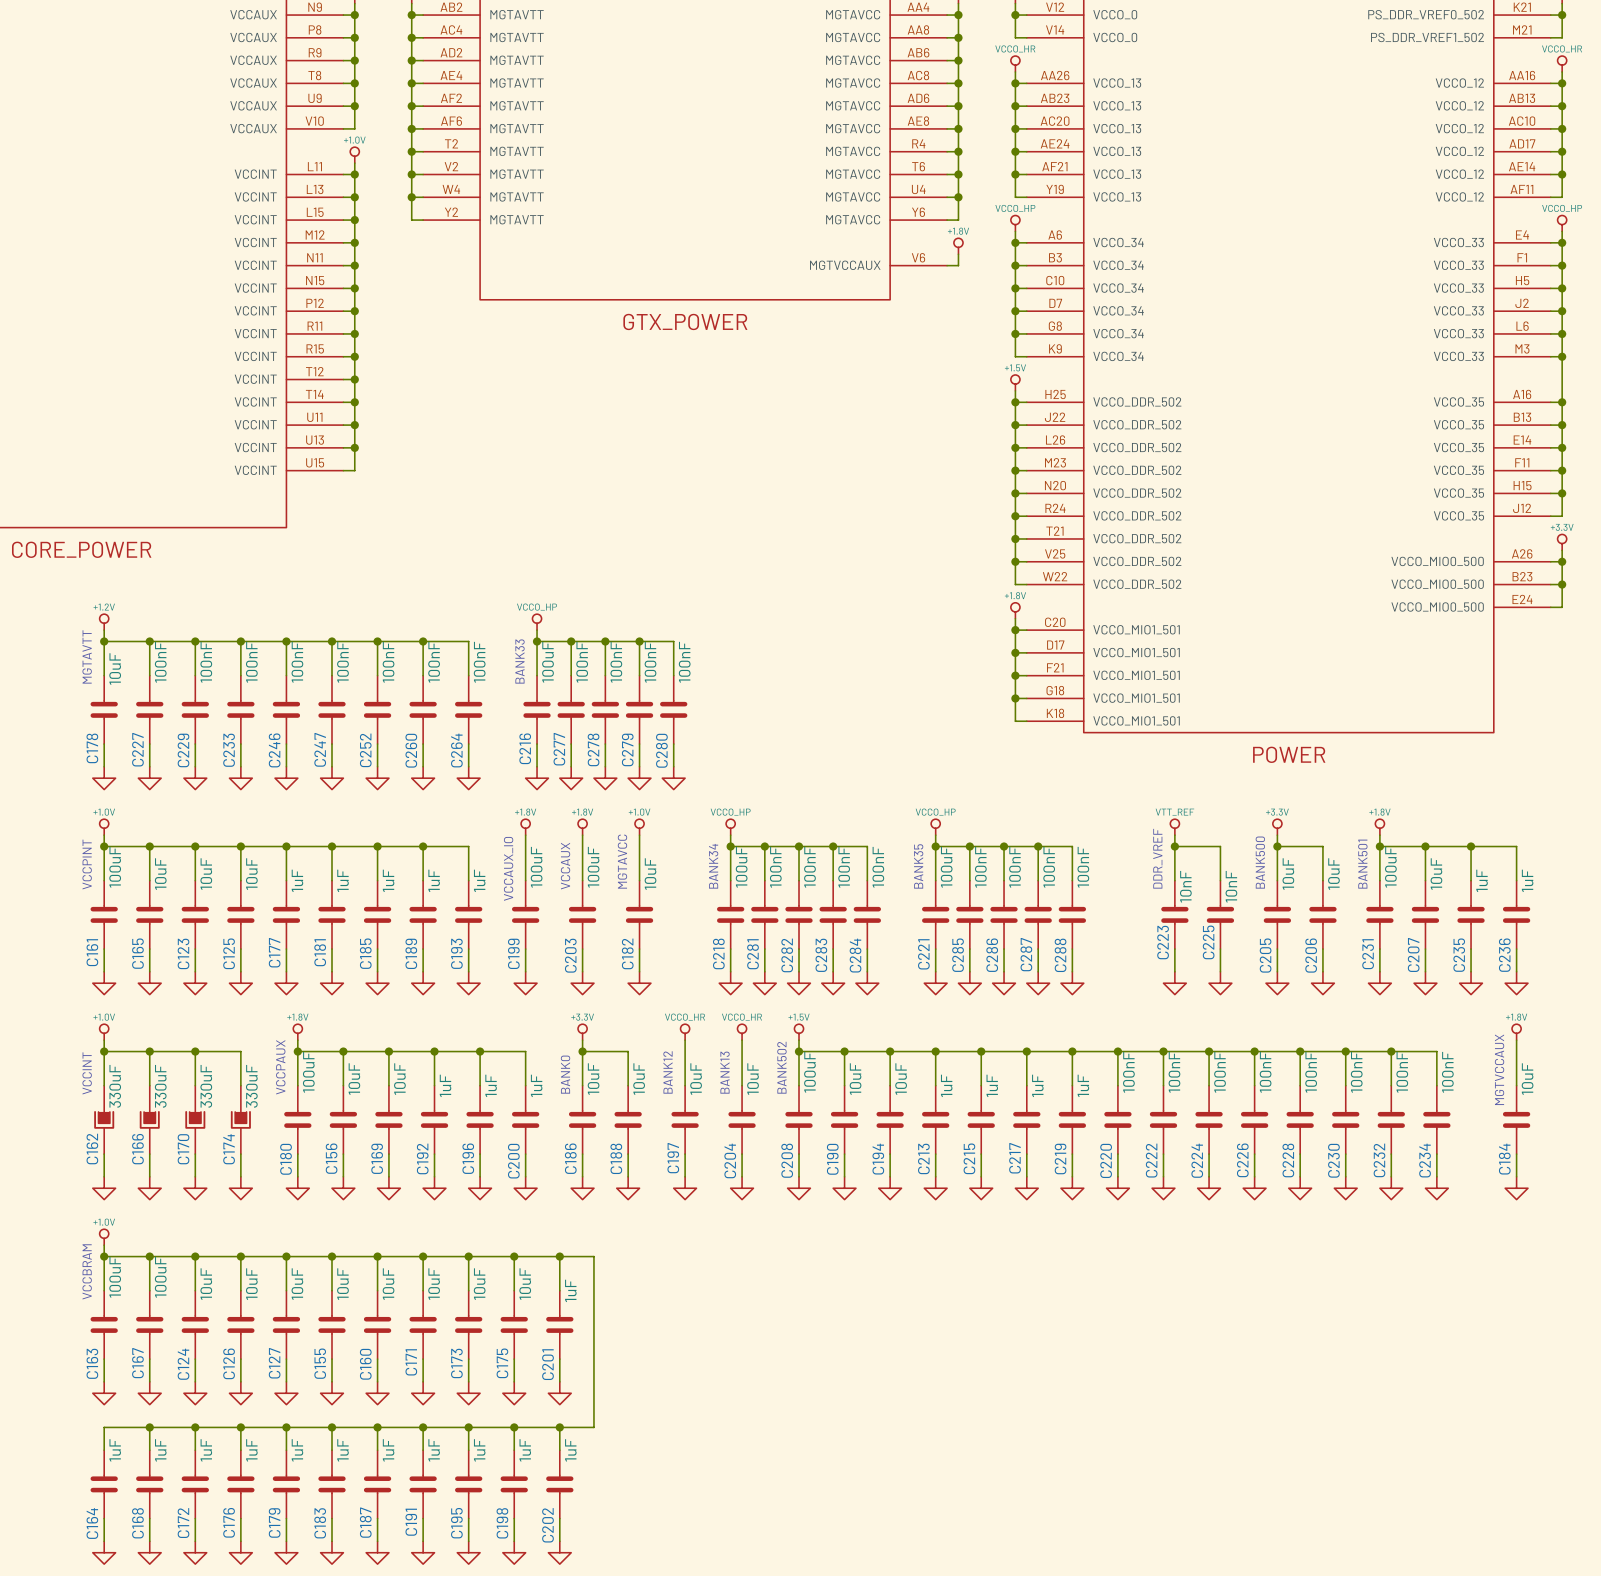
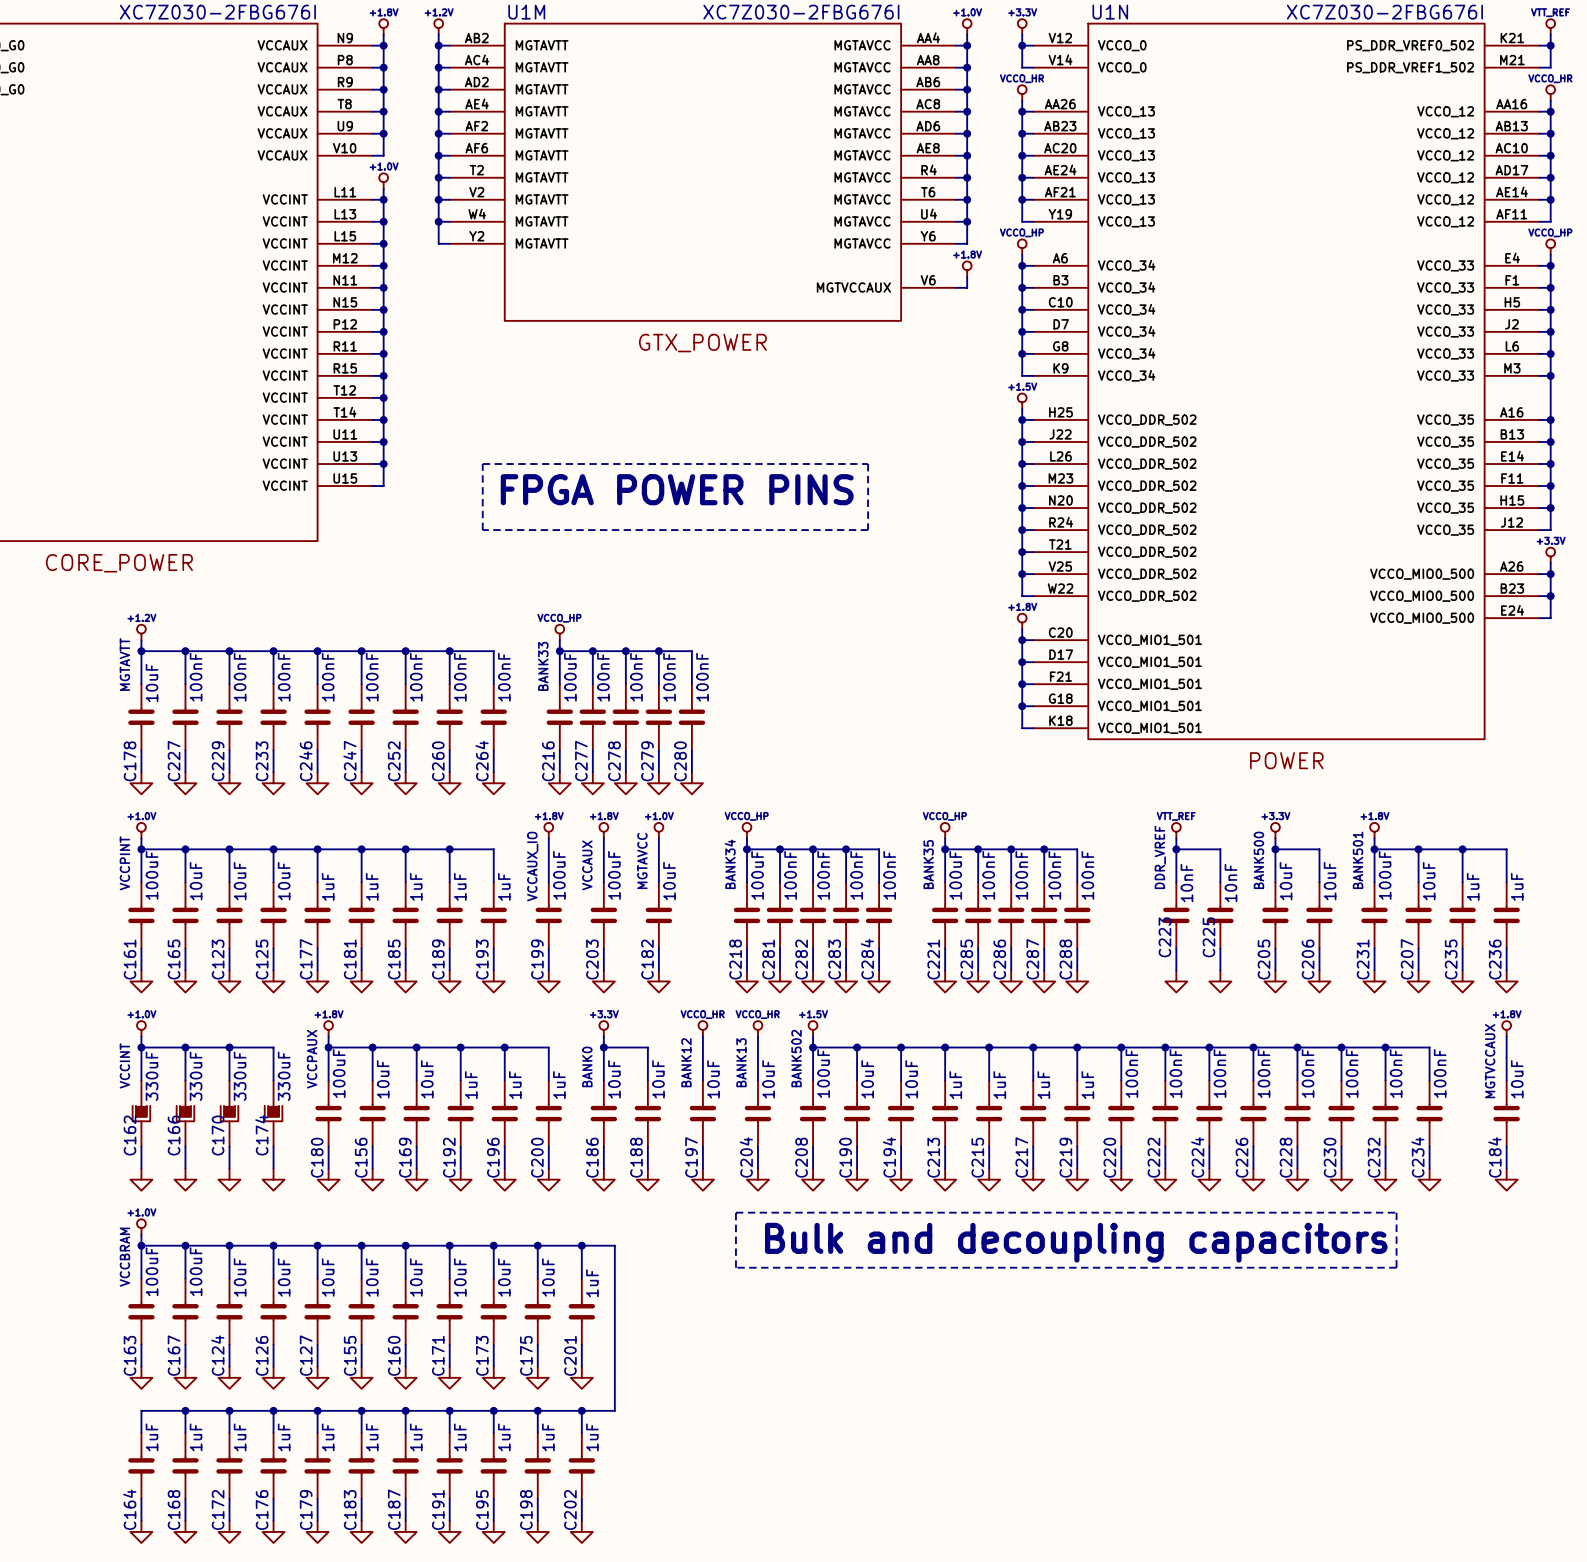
line: none -> (482, 464) (482, 530) (868, 530) (868, 464) (482, 464)
text: none -> FPGA POWER PINS (677, 489)
line: none -> (735, 1212) (1396, 1212) (1396, 1267) (735, 1267) (735, 1212)
text: none -> Bulk and decoupling capacitors (1076, 1242)

